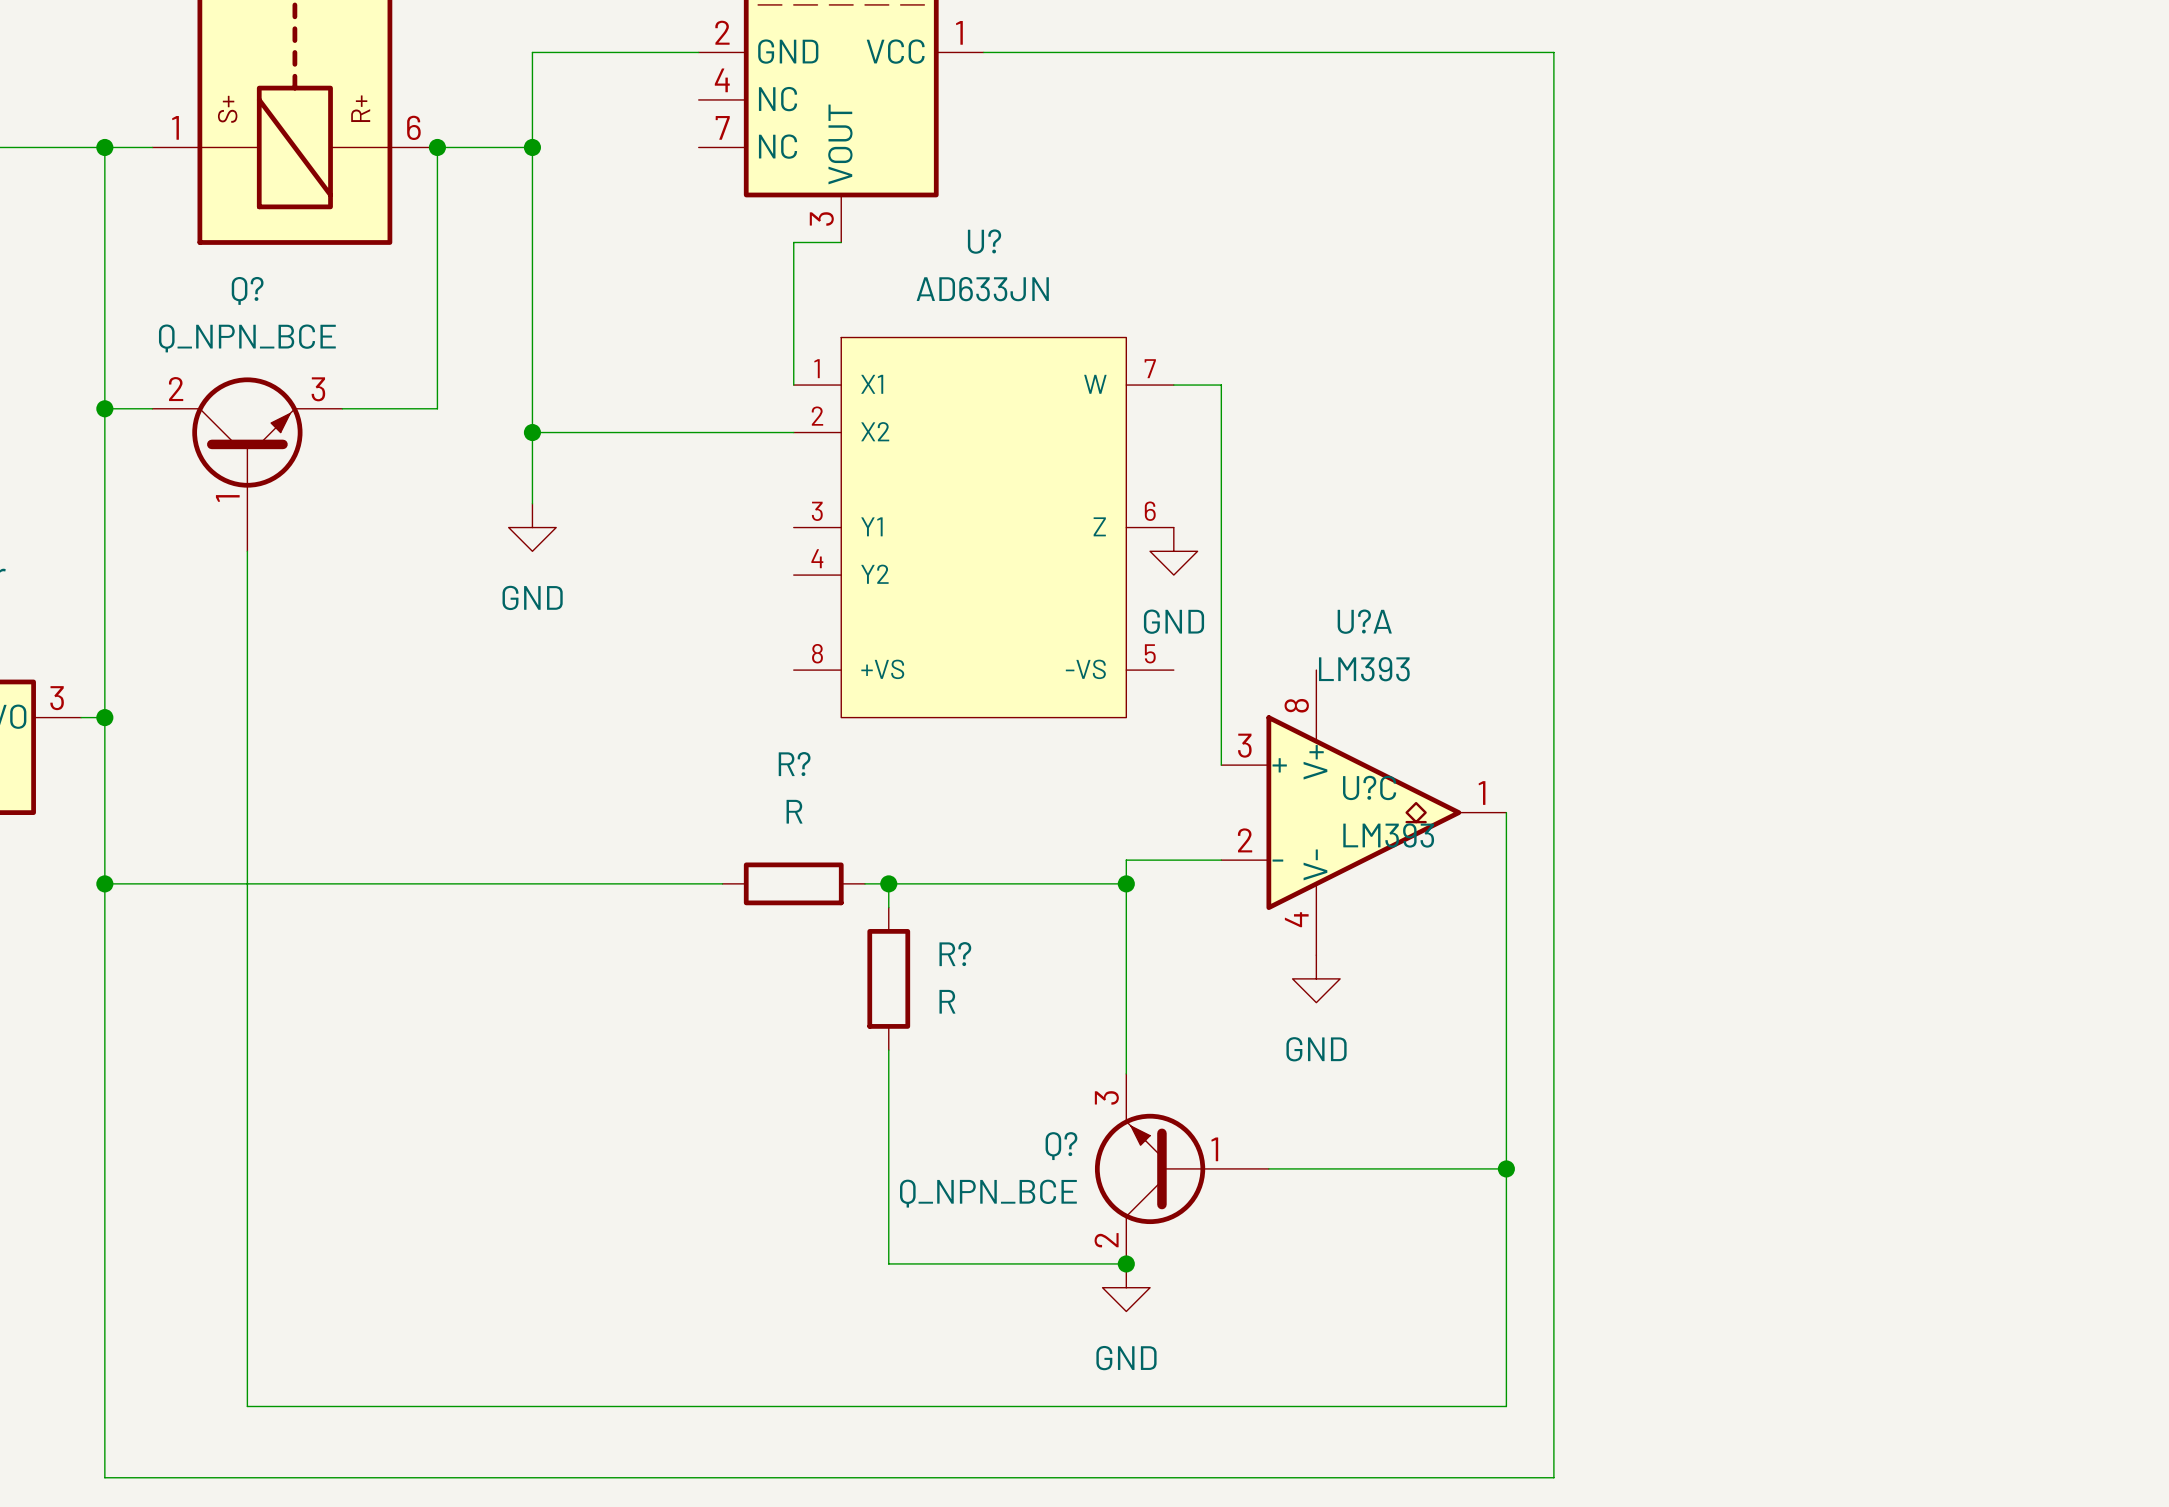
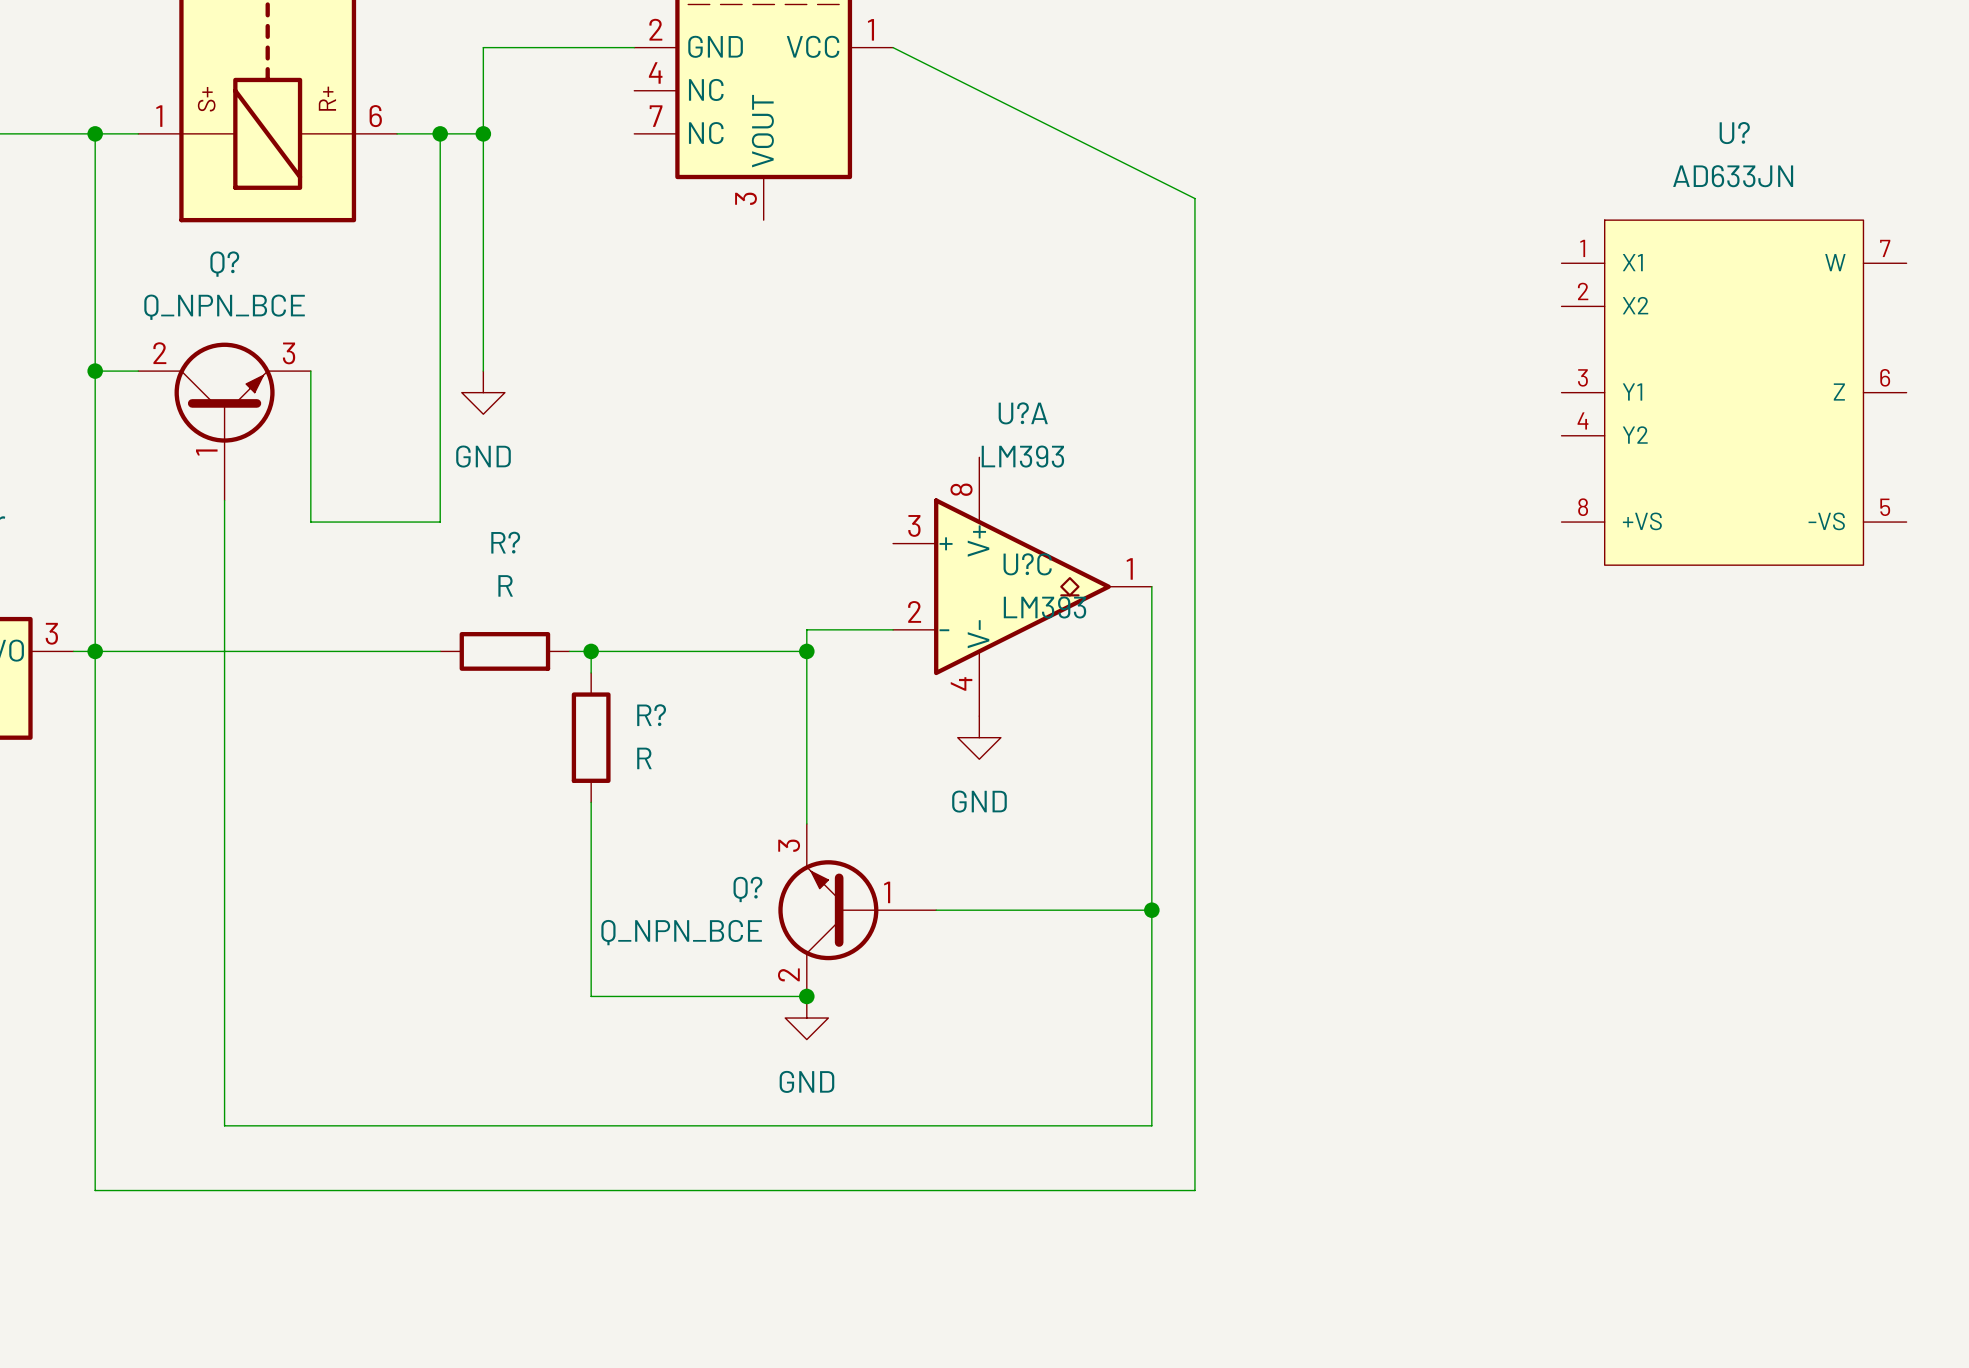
wire: (983, 52) (1553, 52) (1553, 1477) (104, 1477) (104, 1311) -> (893, 47) (1194, 198) (1194, 1190) (95, 1190)
wire: (437, 147) (437, 408) (342, 408) -> (440, 133) (440, 522) (310, 522) (310, 371)
junction position: (437, 147) -> (440, 133)
wire: (841, 242) (793, 242) (793, 385) -> none
wire: (1173, 385) (1221, 385) (1221, 765) -> none
wire: (532, 408) (532, 503) -> none
wire: (532, 432) (793, 432) -> none
junction: (532, 432) -> none
U?: none -> AD633JN (1734, 392)
power symbol position: GND (532, 527) -> GND (483, 392)
U?: AD633JN (983, 527) -> none
power symbol: GND (1173, 551) -> none
wire: none -> (893, 629) (806, 629) (806, 802)
wire: none -> (95, 651) (440, 651)
R?: none -> R (504, 651)
wire: none -> (591, 651) (591, 672)
junction: none -> (591, 651)
junction: none -> (806, 651)
R?: none -> R (591, 737)
power symbol: none -> GND (979, 737)
U?C position: (1316, 812) -> (979, 586)
U?A position: (1363, 812) -> (1022, 586)
wire: (1506, 812) (1506, 1406) (247, 1406) (247, 1240) -> (1151, 586) (1151, 1125) (224, 1125)
wire: (1221, 860) (1126, 860) (1126, 1073) -> none
wire: (104, 883) (722, 883) -> none
junction: (104, 883) -> none
R?: R (793, 883) -> none
wire: (865, 883) (1126, 883) -> (569, 651) (806, 651)
junction: (888, 883) -> none
junction: (1126, 883) -> none
R?: R (888, 978) -> none
power symbol: GND (1316, 978) -> none
junction: none -> (1151, 910)
wire: (888, 1050) (888, 1263) (1126, 1263) -> (591, 802) (591, 996) (806, 996)
junction: none -> (806, 996)
power symbol: none -> GND (806, 1018)
Q? position: (1181, 1168) -> (857, 910)
wire: (1268, 1168) (1506, 1168) -> (936, 910) (1151, 910)
junction: (1506, 1168) -> none
junction: (1126, 1263) -> none
power symbol: GND (1126, 1287) -> none

